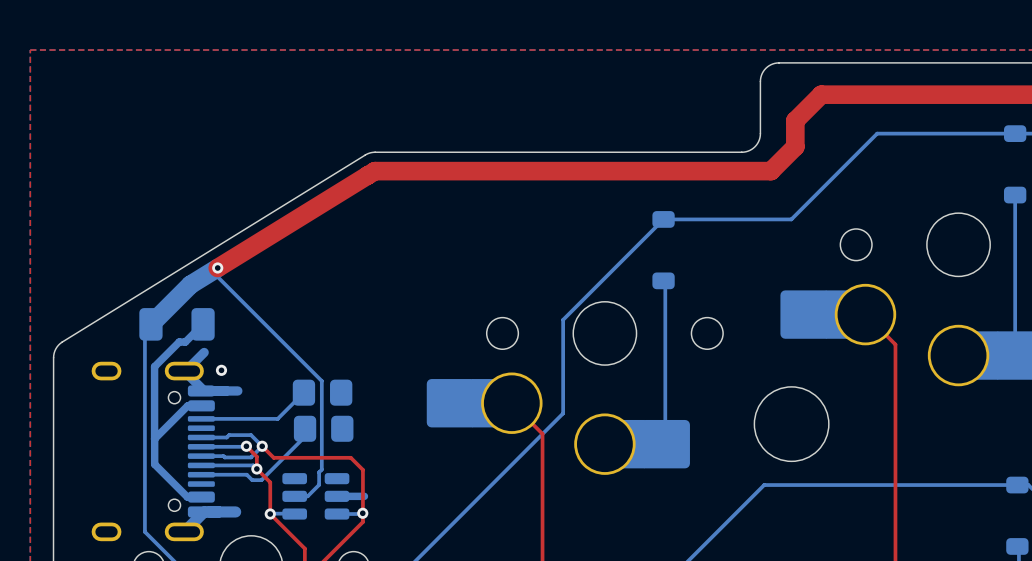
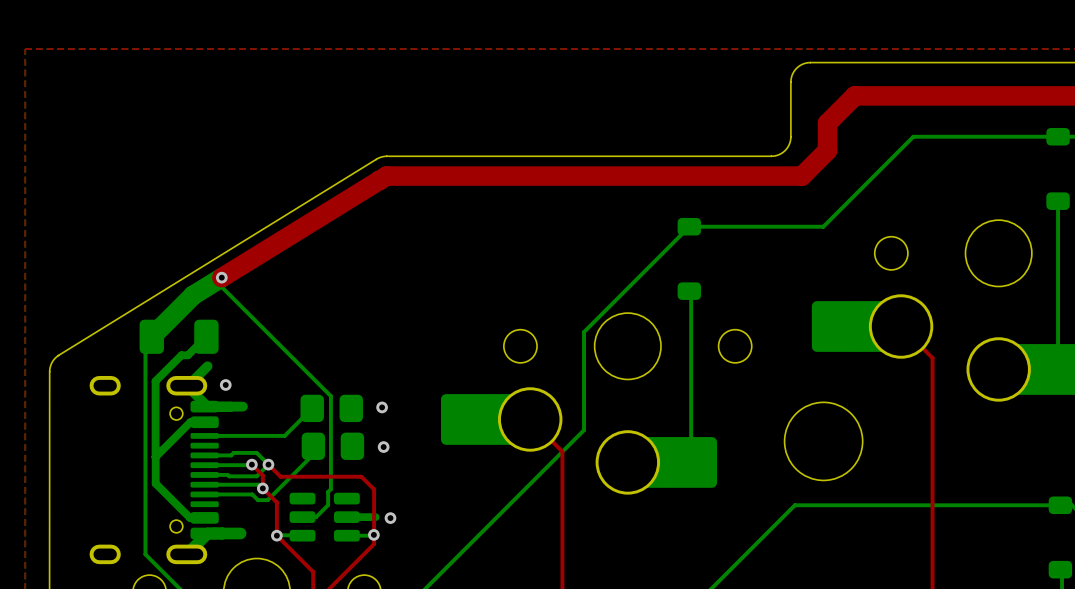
via: none -> (382, 407)
via: none -> (383, 447)
via: none -> (390, 518)

